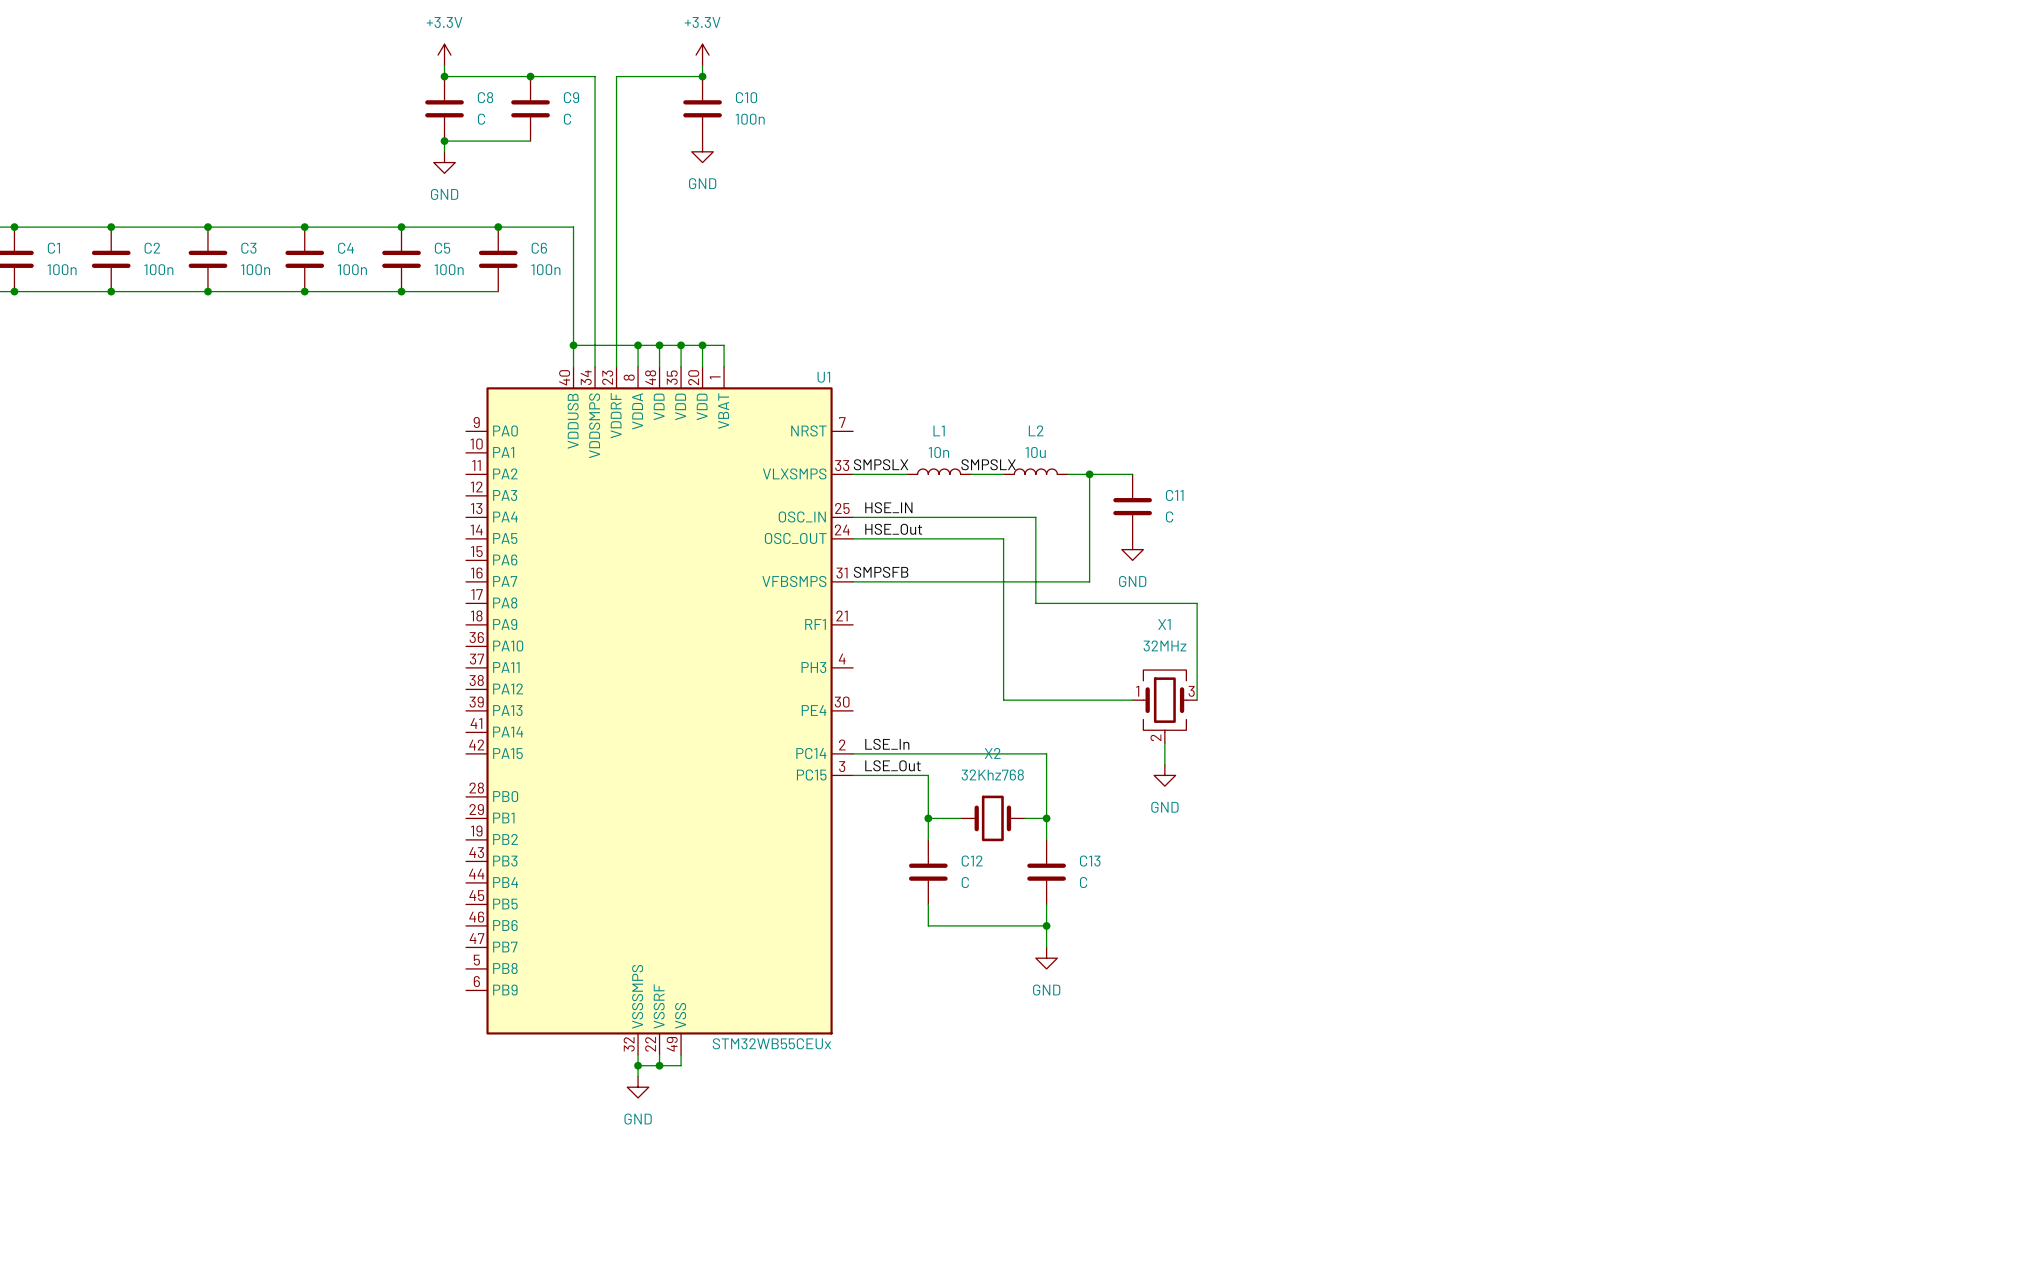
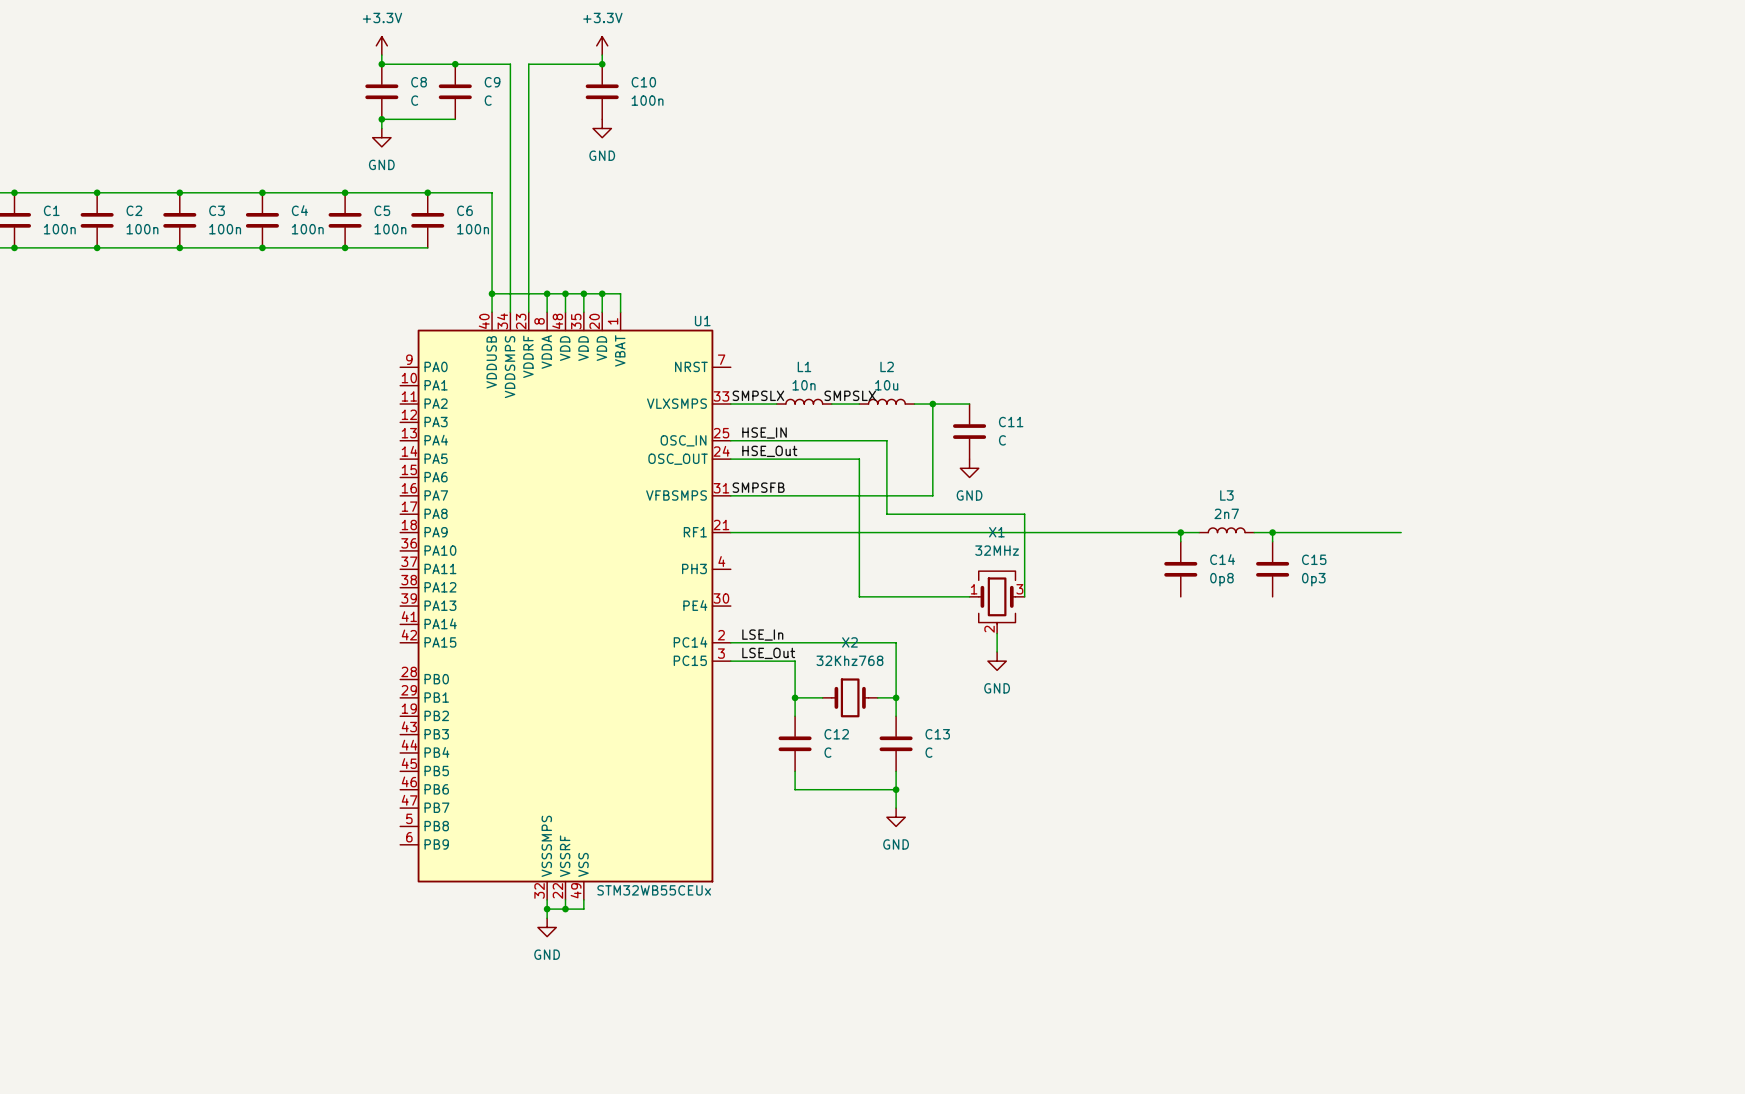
L3: none -> 2n7 (1226, 530)
wire: none -> (730, 532) (1199, 532)
wire: none -> (1180, 532) (1180, 541)
junction: none -> (1180, 532)
wire: none -> (1254, 532) (1401, 532)
wire: none -> (1272, 532) (1272, 541)
junction: none -> (1272, 532)
C14: none -> 0p8 (1180, 569)
C15: none -> 0p3 (1272, 569)

